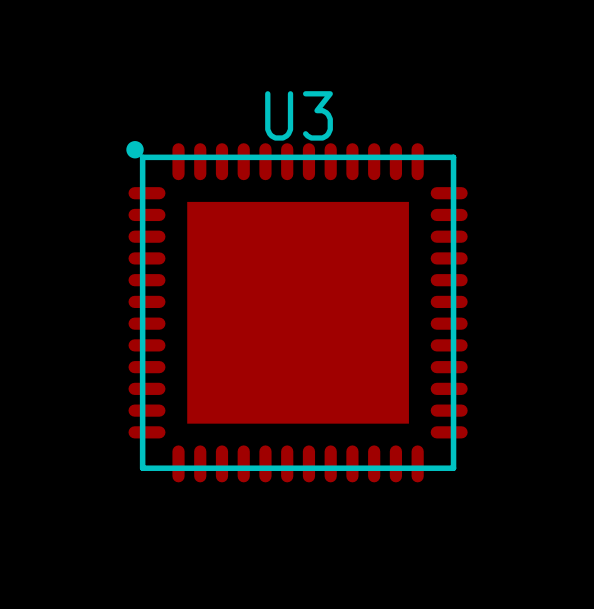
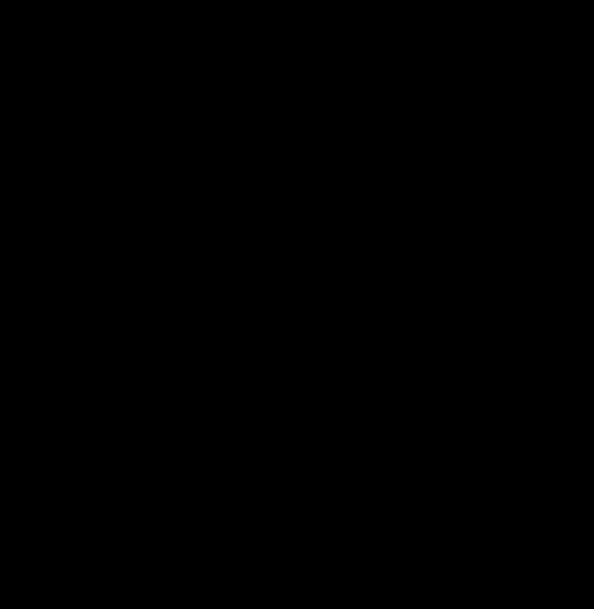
U3: (296, 311) -> none

